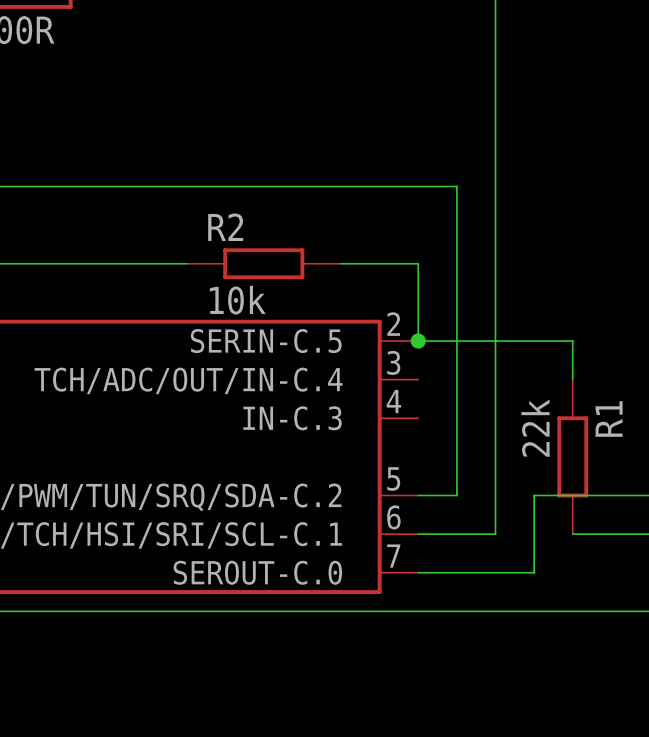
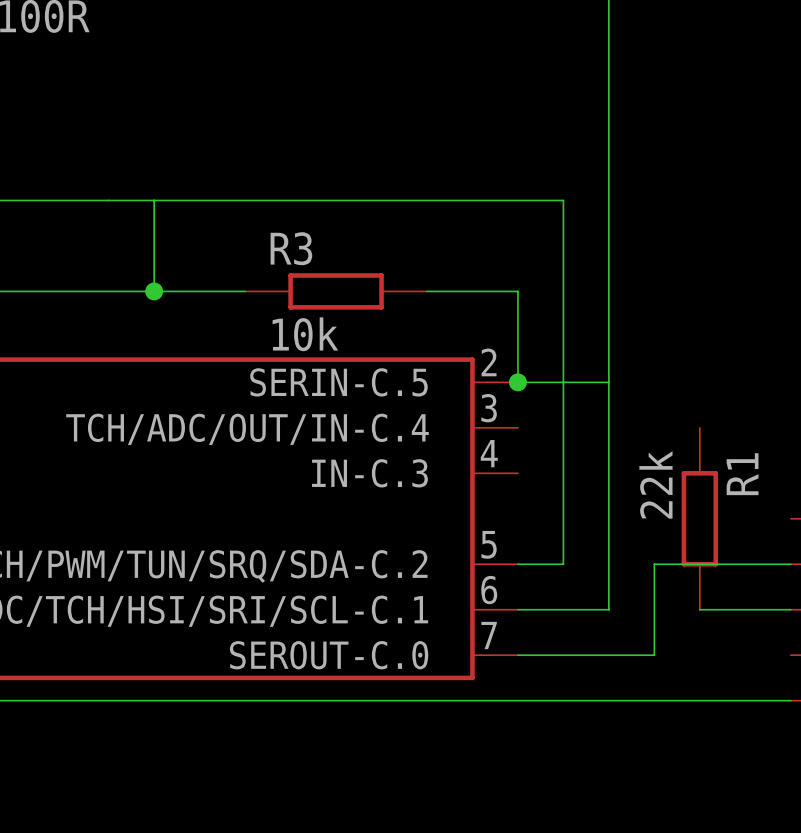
wire: none -> (154, 200) (154, 291)
R2 name: R2 (225, 227) -> R3 (291, 248)
junction: none -> (154, 291)
wire: (495, 341) (572, 341) (572, 379) -> none

